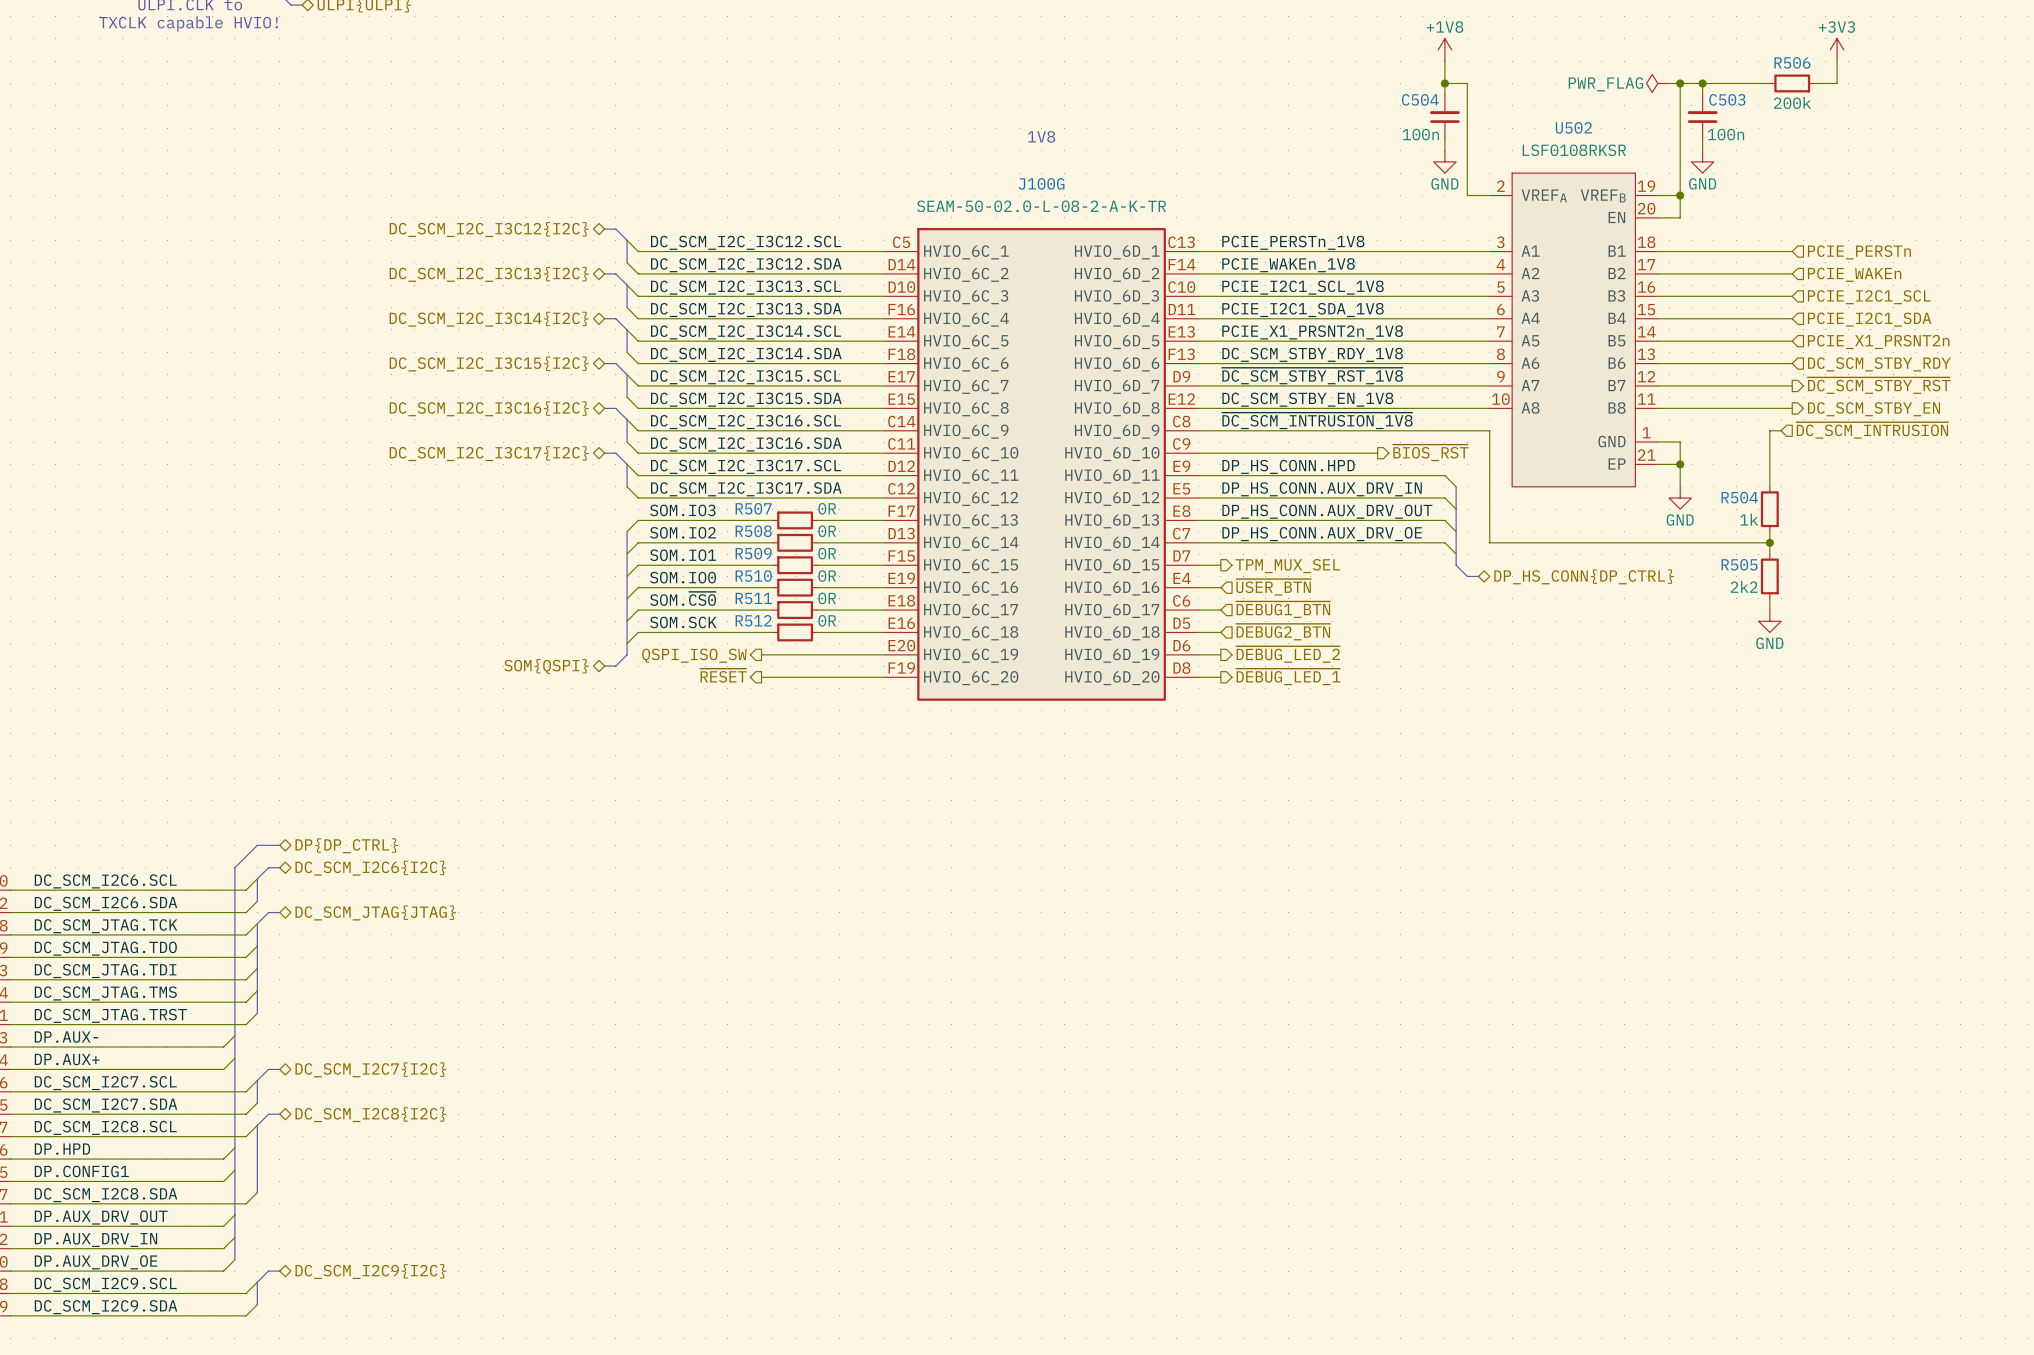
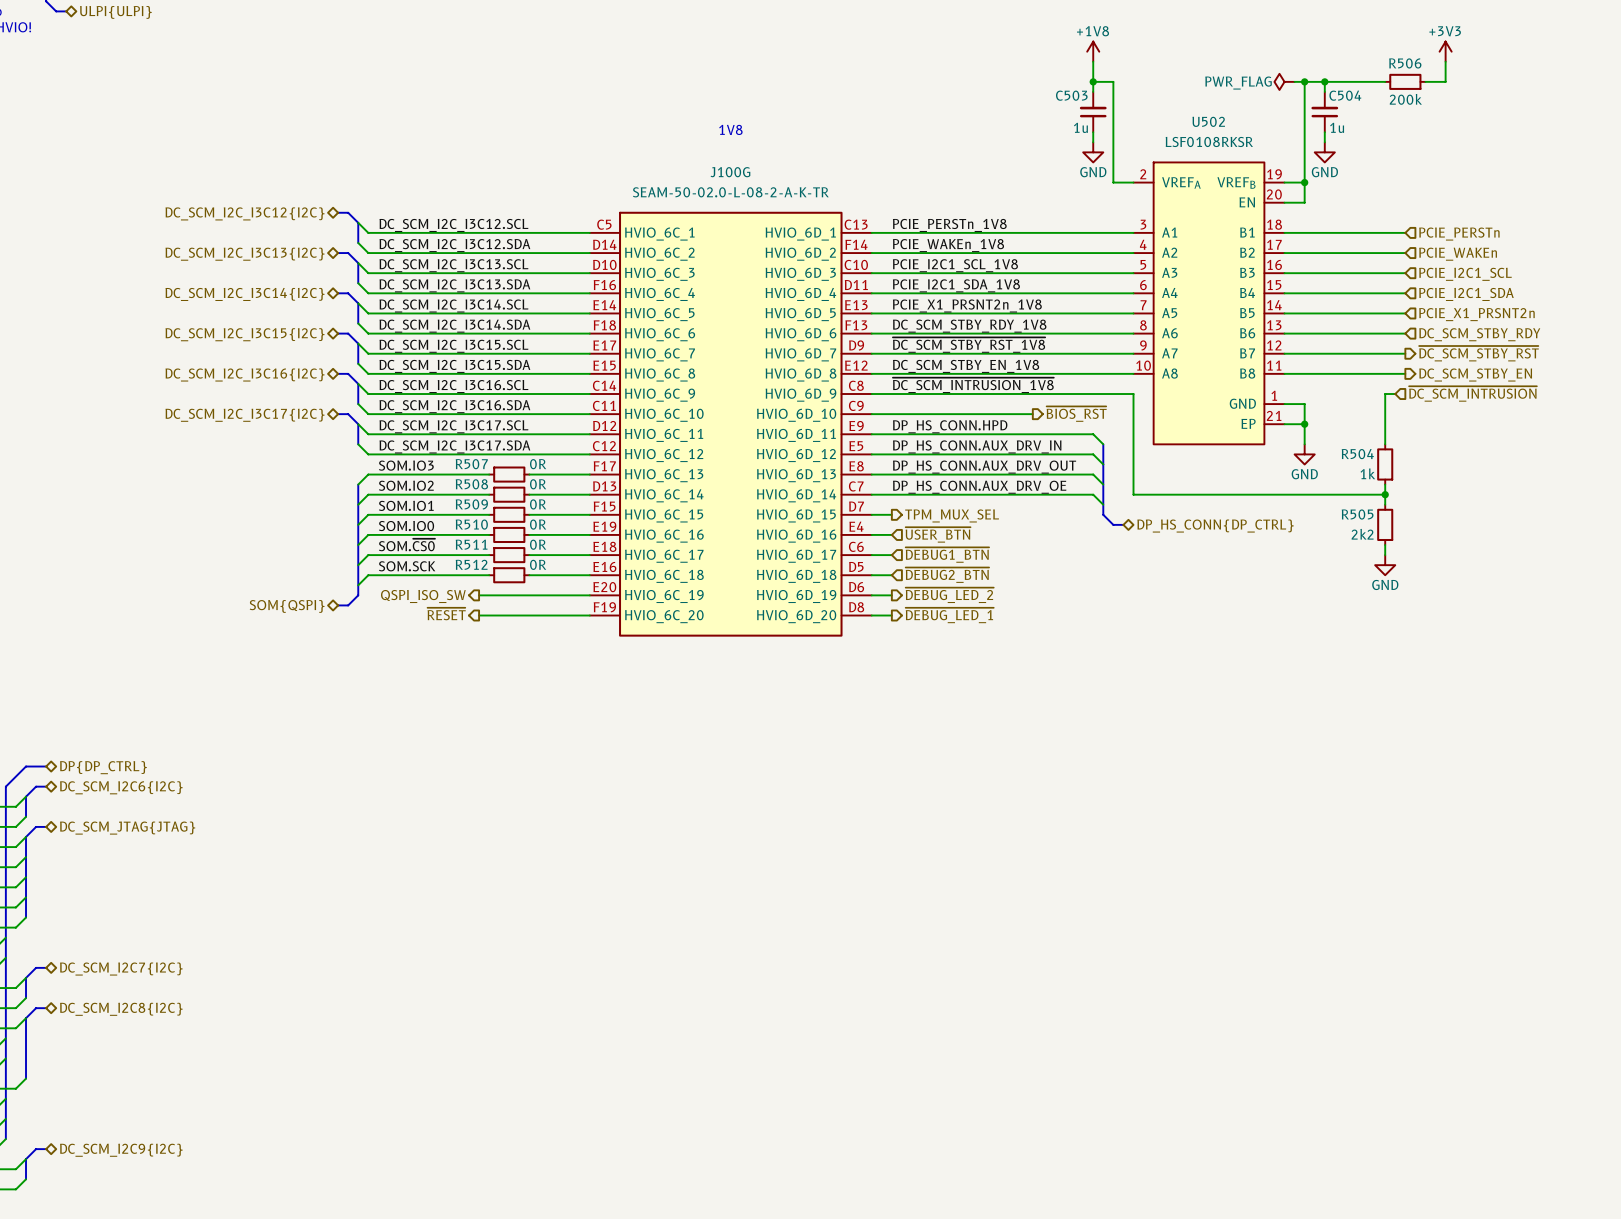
C504 name: C504 (1420, 99) -> C503 (1071, 95)
C503 name: C503 (1727, 99) -> C504 (1345, 95)
C504 text: 100n (1420, 134) -> 1u (1080, 127)
C503 text: 100n (1726, 134) -> 1u (1337, 127)

